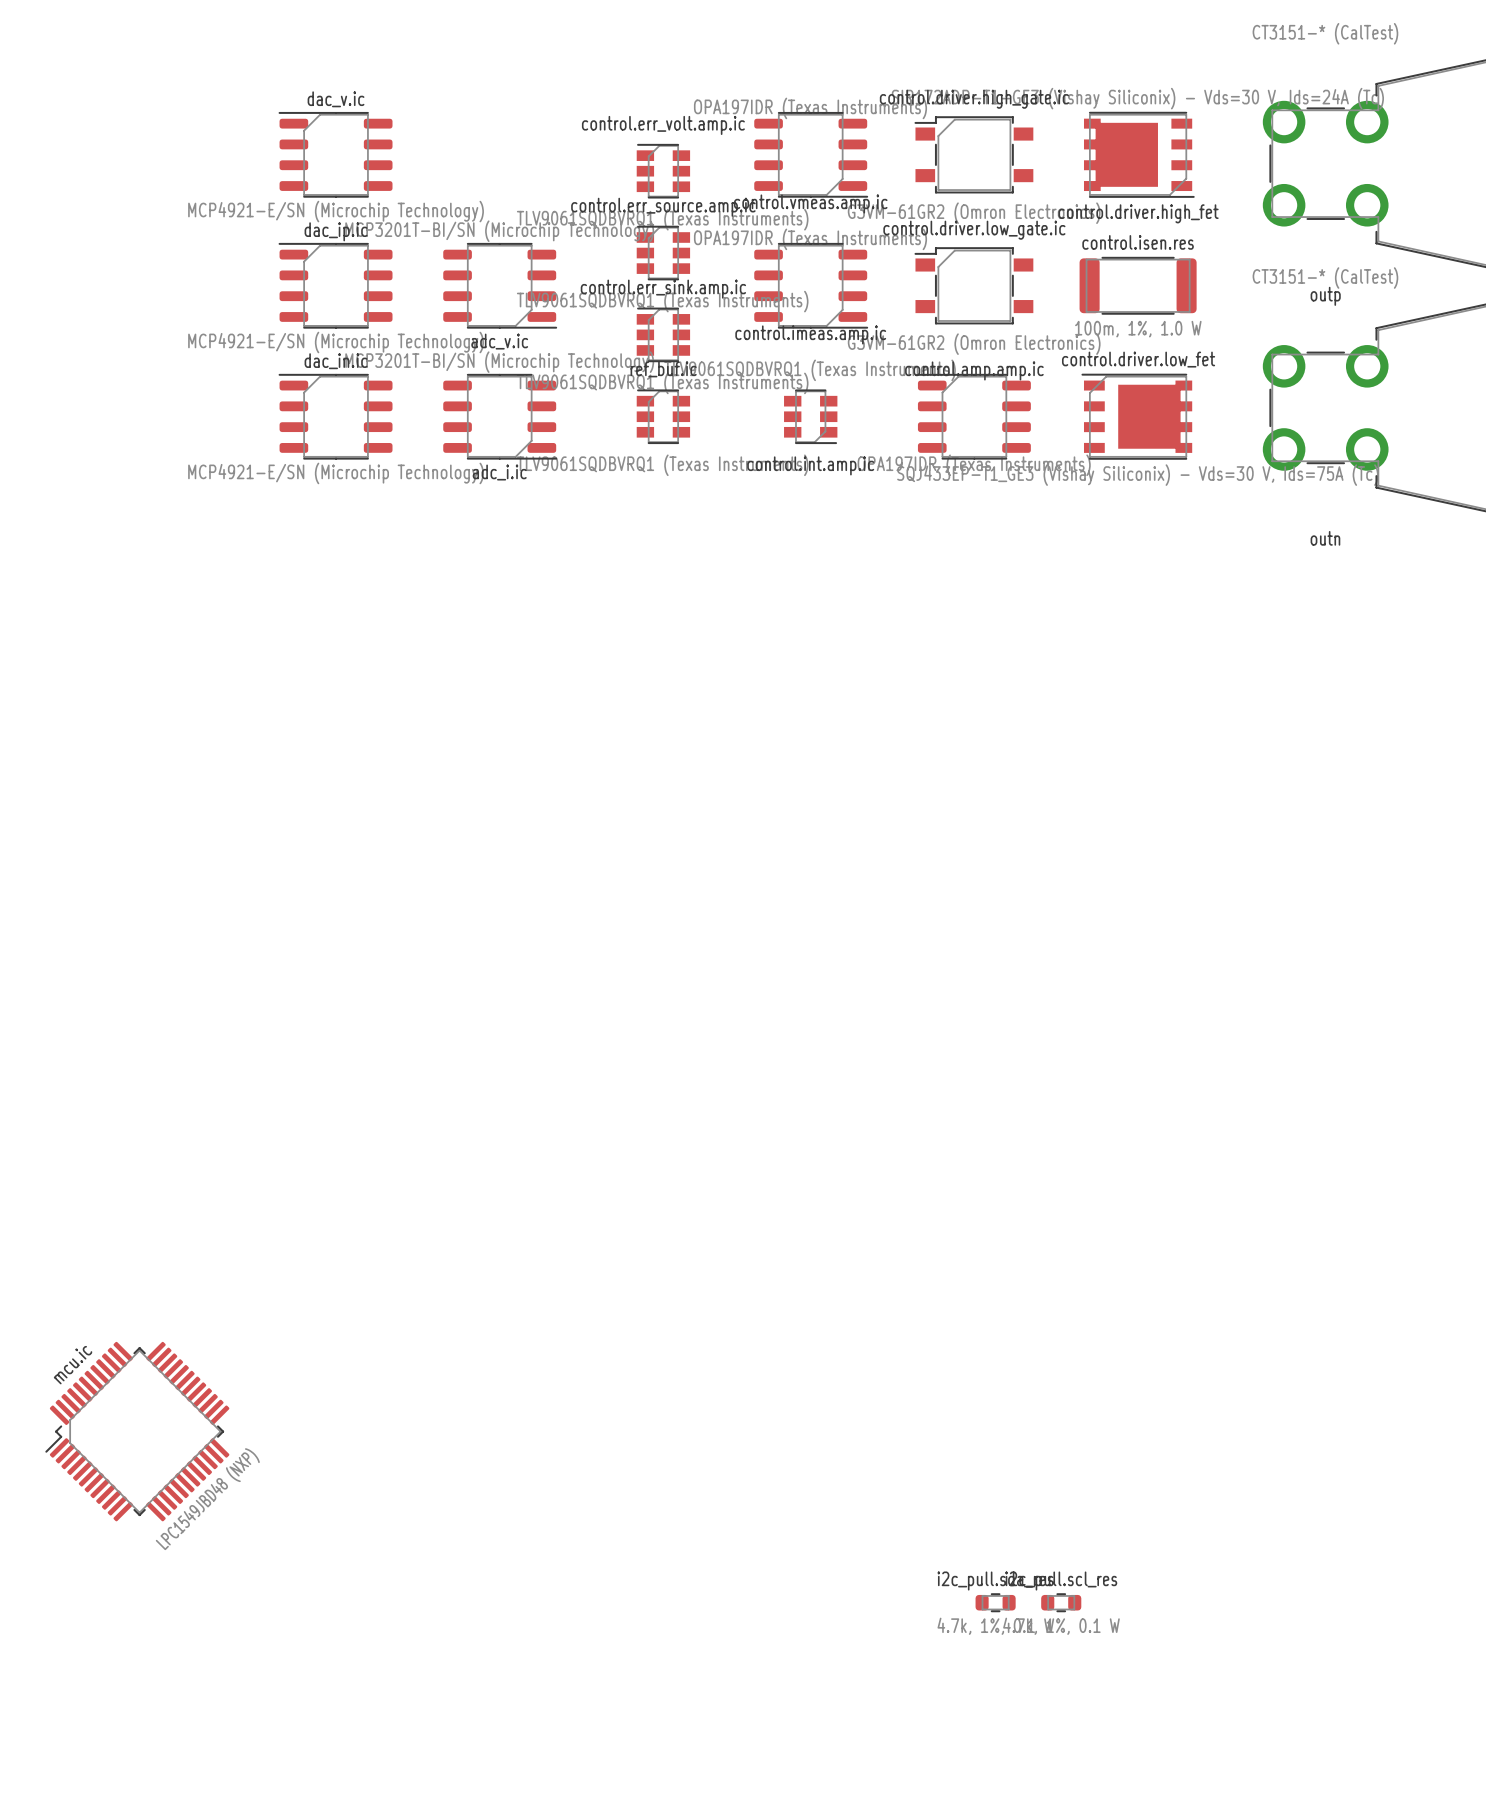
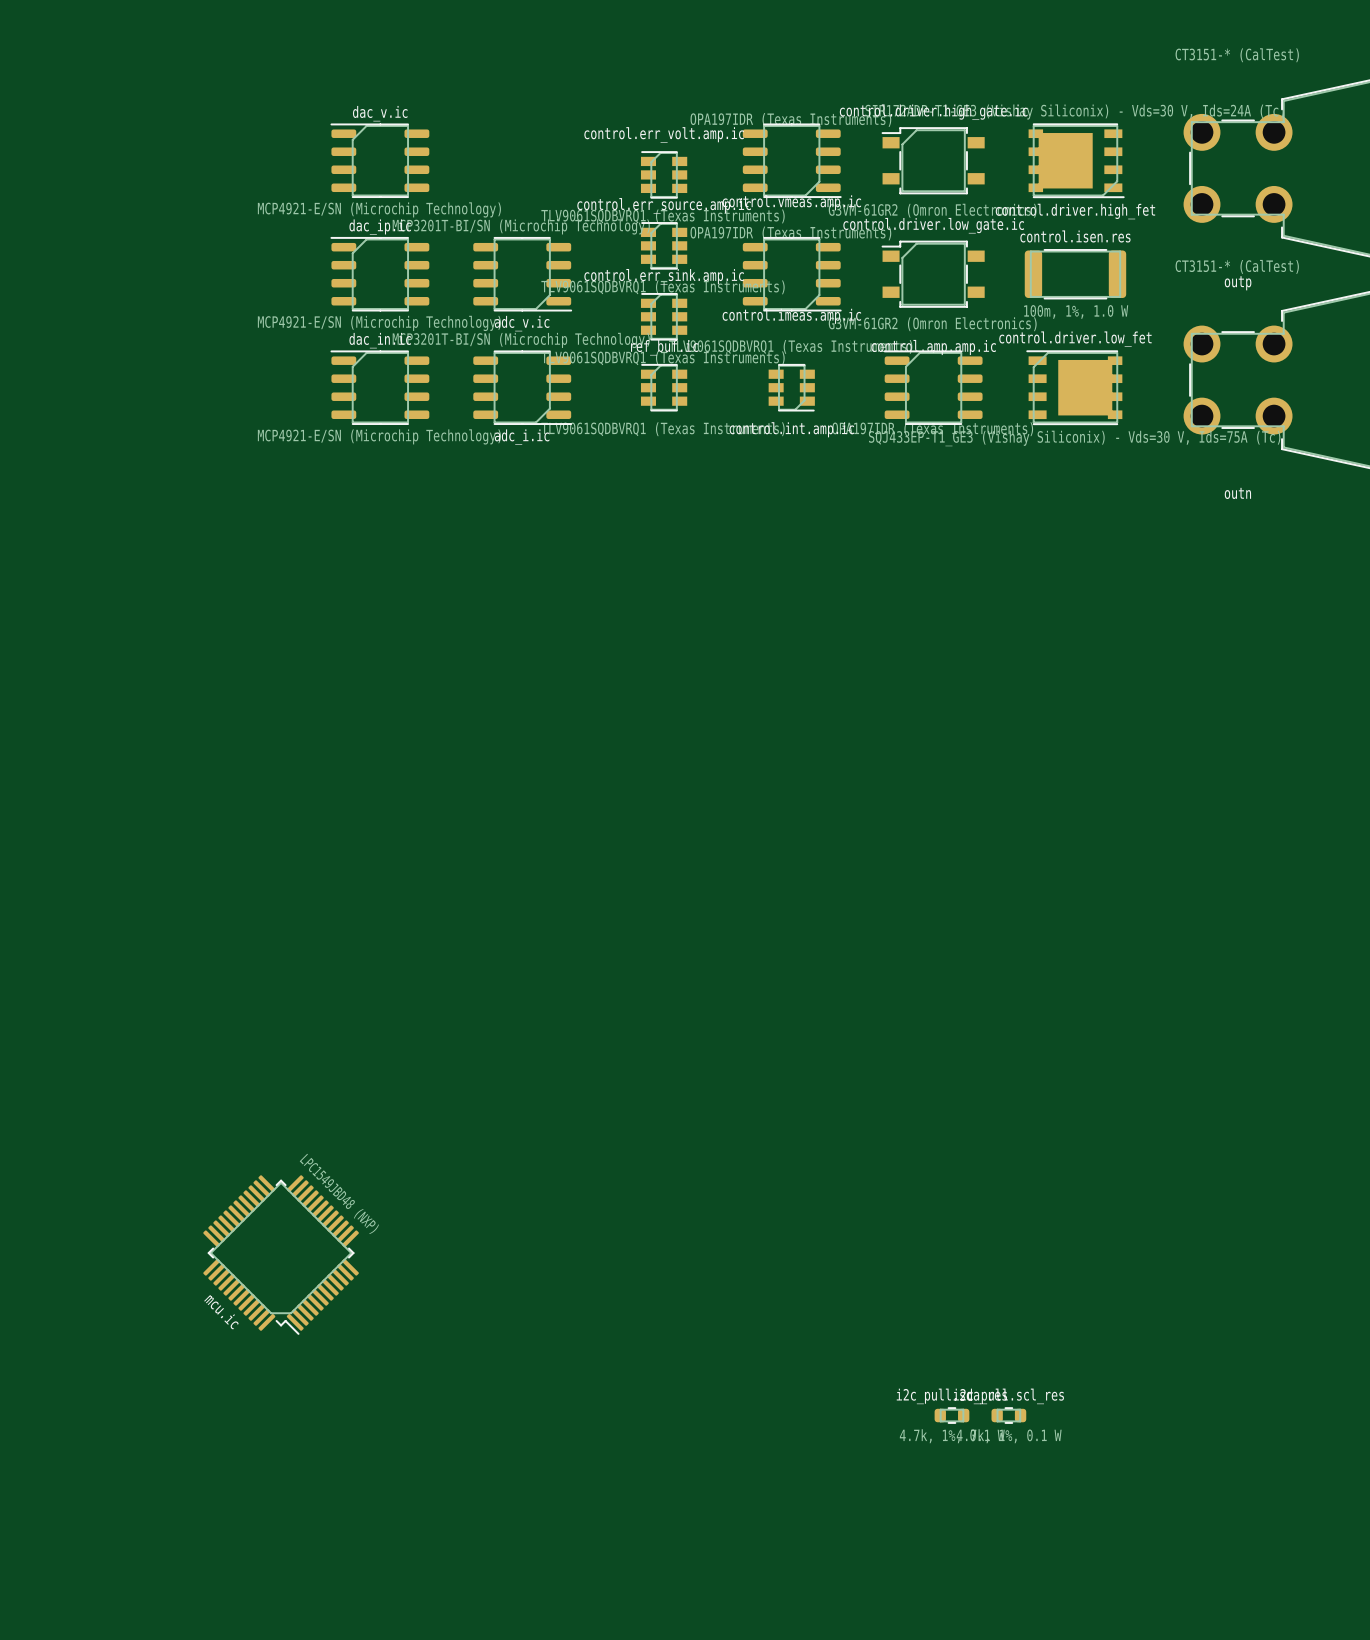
mcu.ic rotation: 0° (137, 1431) -> 90° counterclockwise (281, 1254)

